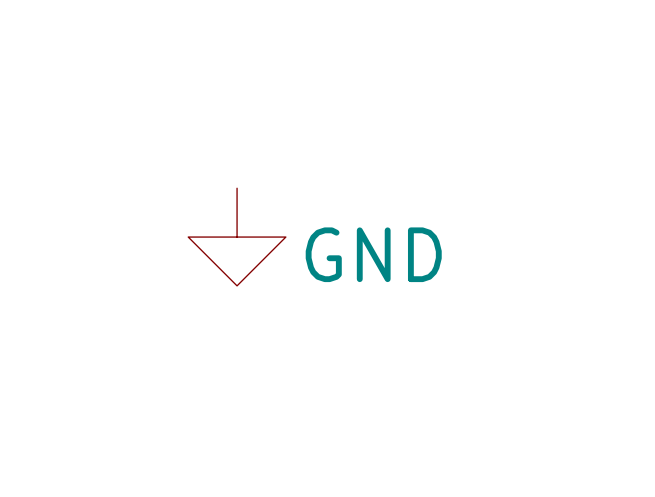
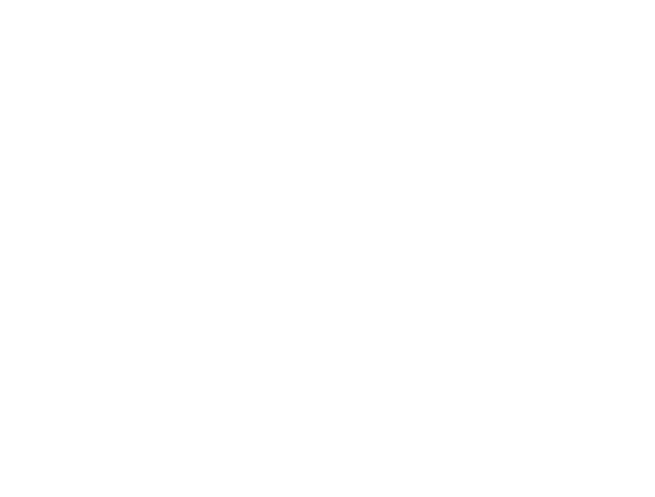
power symbol: GND (237, 237) -> none

